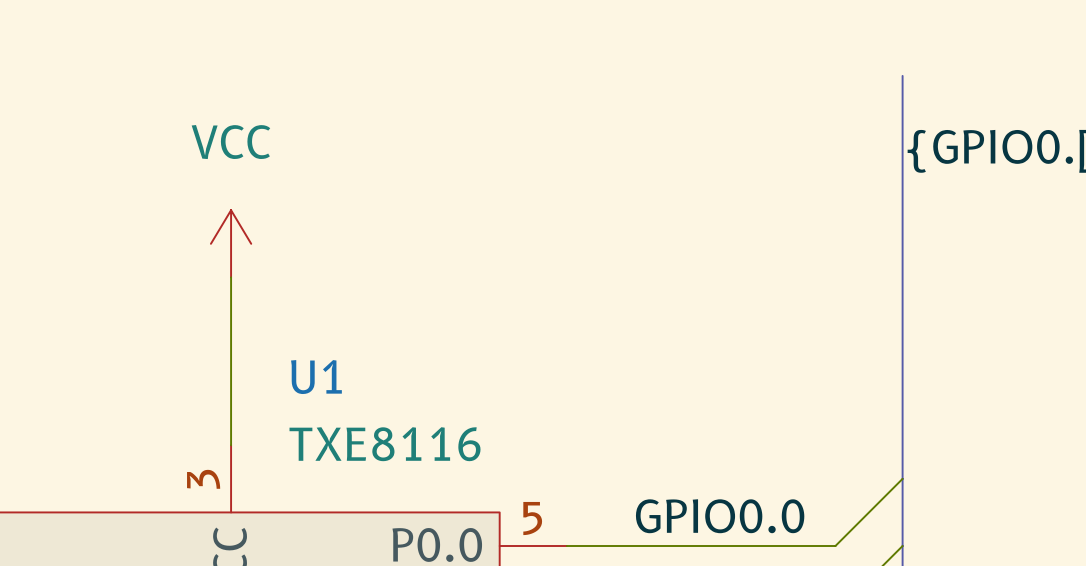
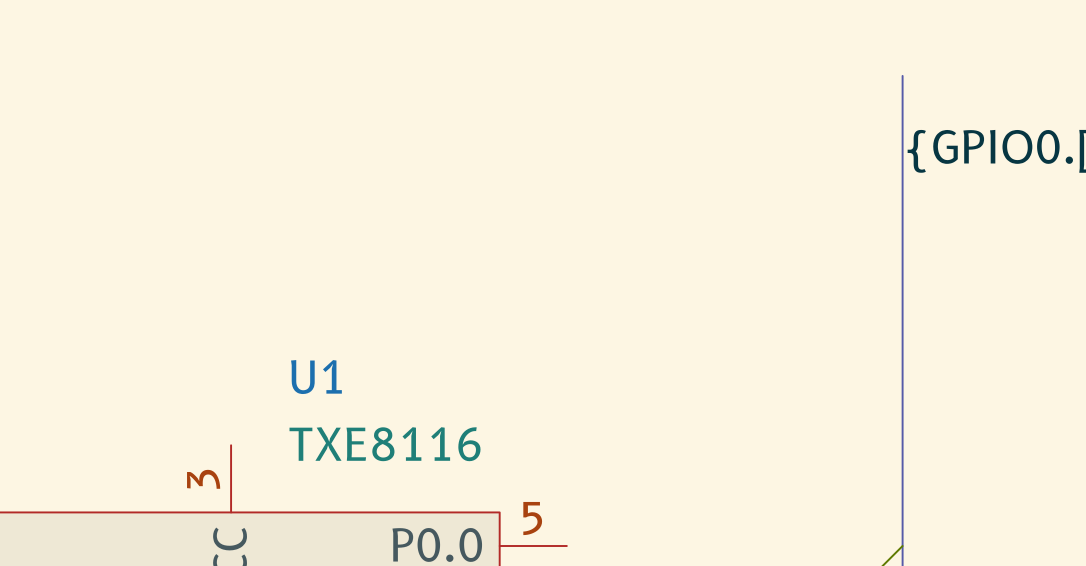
power symbol: VCC (231, 243) -> none
wire: (231, 277) (231, 445) -> none
wire: (902, 478) (835, 546) (566, 546) -> none
label: GPIO0.0 (720, 516) -> none

